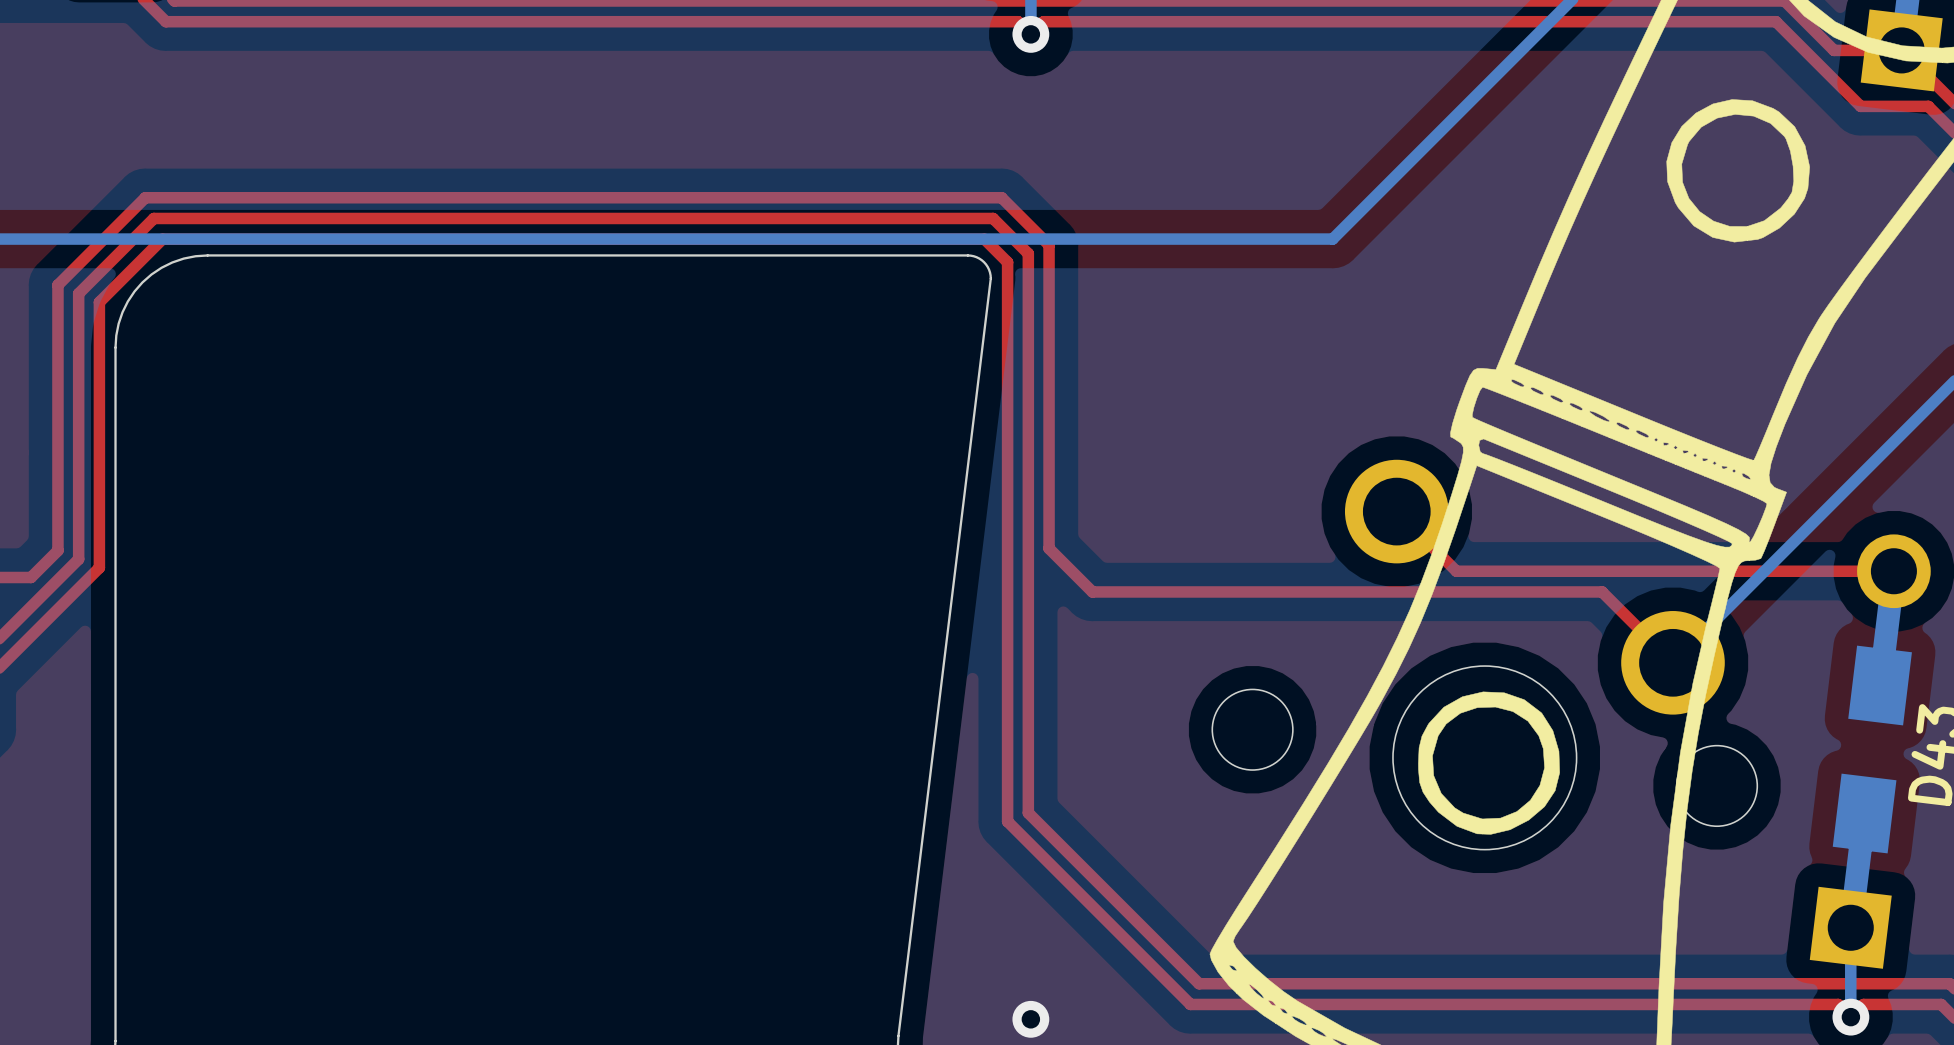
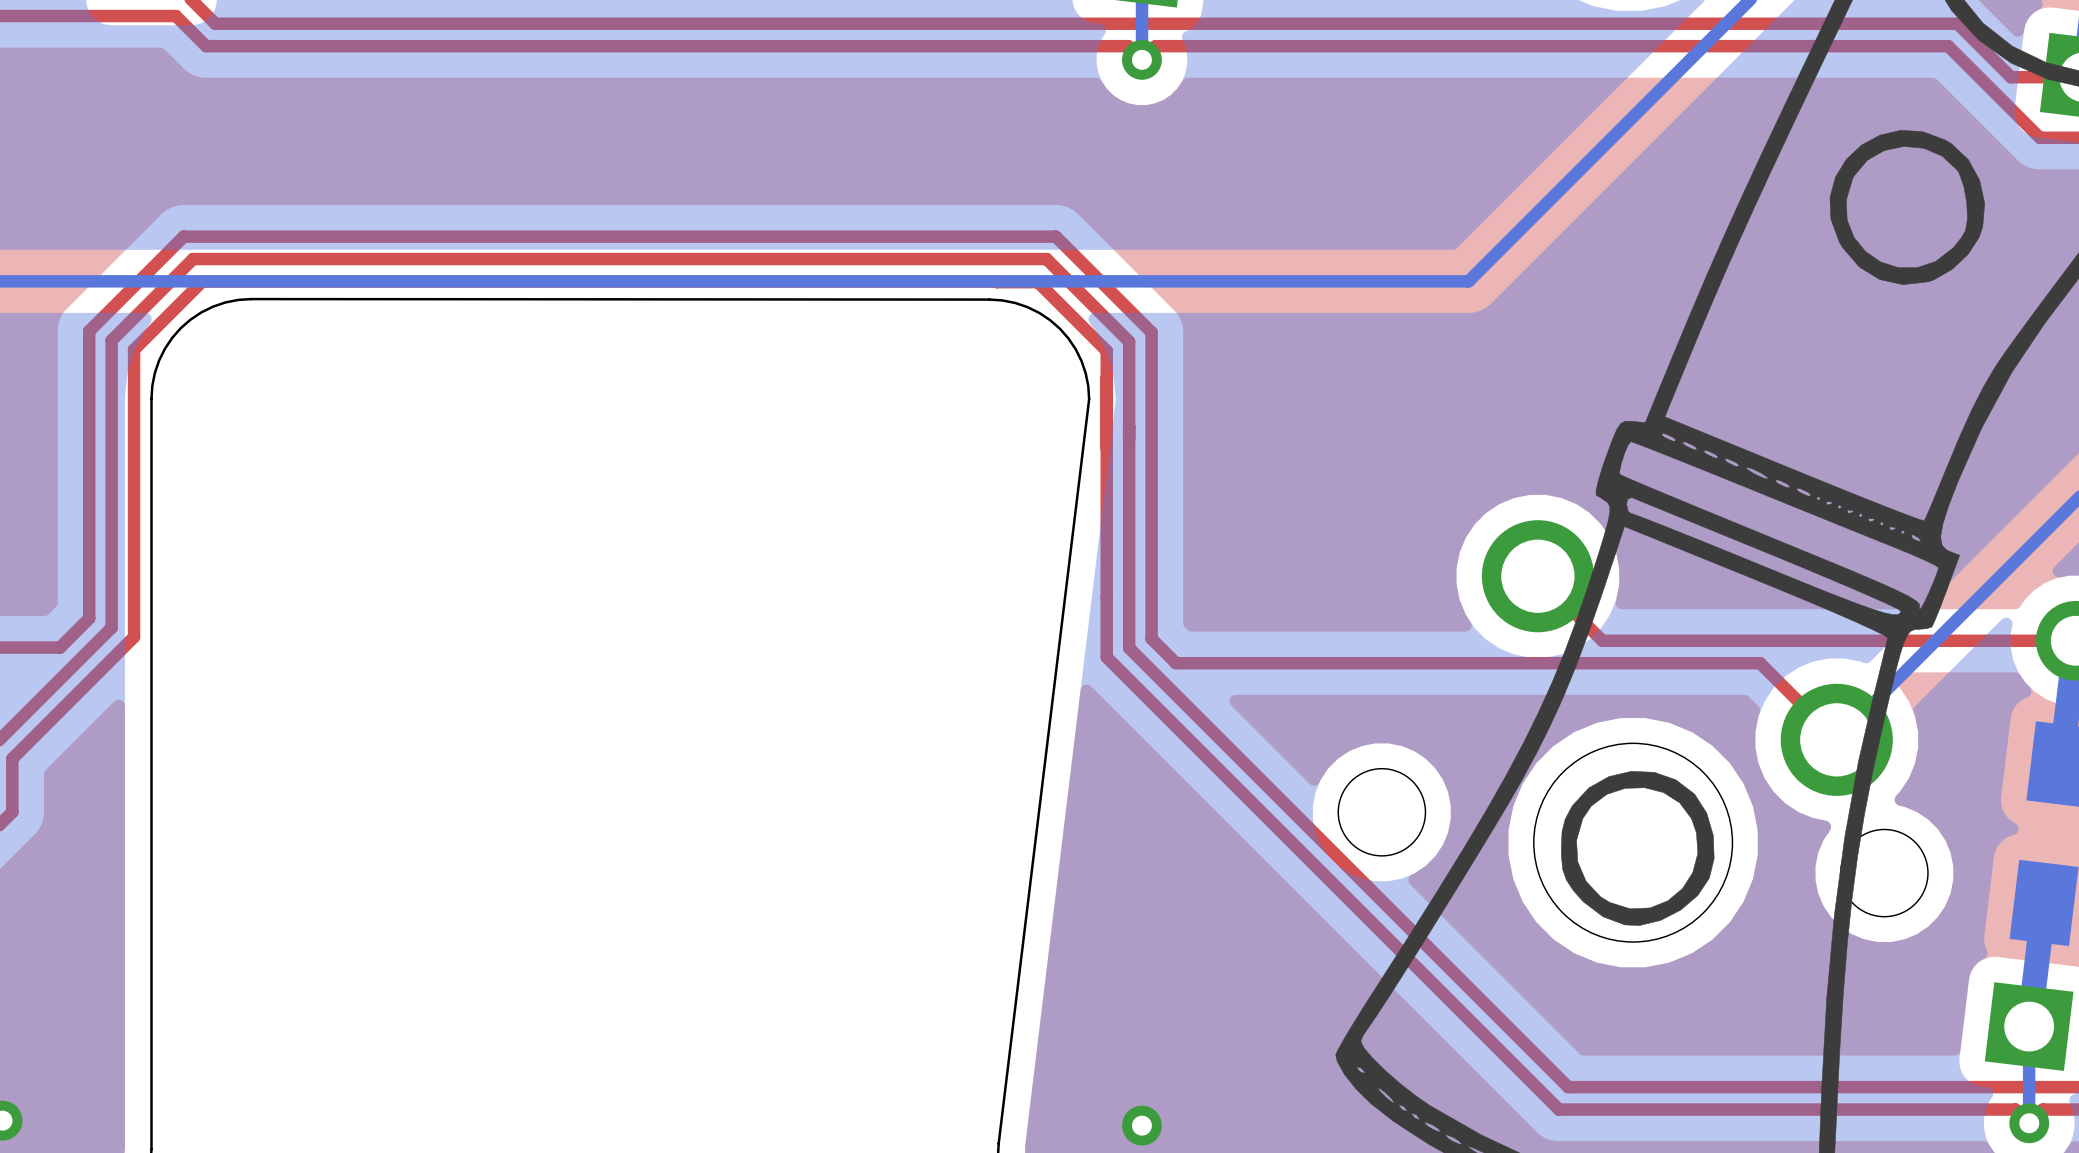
top track: (951, 197) (1001, 197) (1049, 245) (1049, 548) (1092, 591) -> (1055, 236) (1151, 332) (1151, 638) (1176, 663) (1208, 663)
top track: (942, 218) (993, 218) (1028, 253) (1028, 812) (1199, 983) (1424, 983) -> (1046, 259) (1129, 341) (1129, 648) (1568, 1087)
top track: (896, 239) (984, 239) (1007, 262) (1007, 821) (1190, 1004) (1416, 1004) -> (996, 282) (1037, 282) (1106, 350) (1106, 657) (1558, 1109)
board edge: (207, 255) (967, 255) (976, 257) (984, 262) (989, 269) (990, 278) (898, 1035) -> (251, 299) (989, 299) (1015, 302) (1027, 307) (1039, 312) (1059, 328) (1068, 338) (1081, 361) (1085, 373) (1089, 399) (998, 1143)

